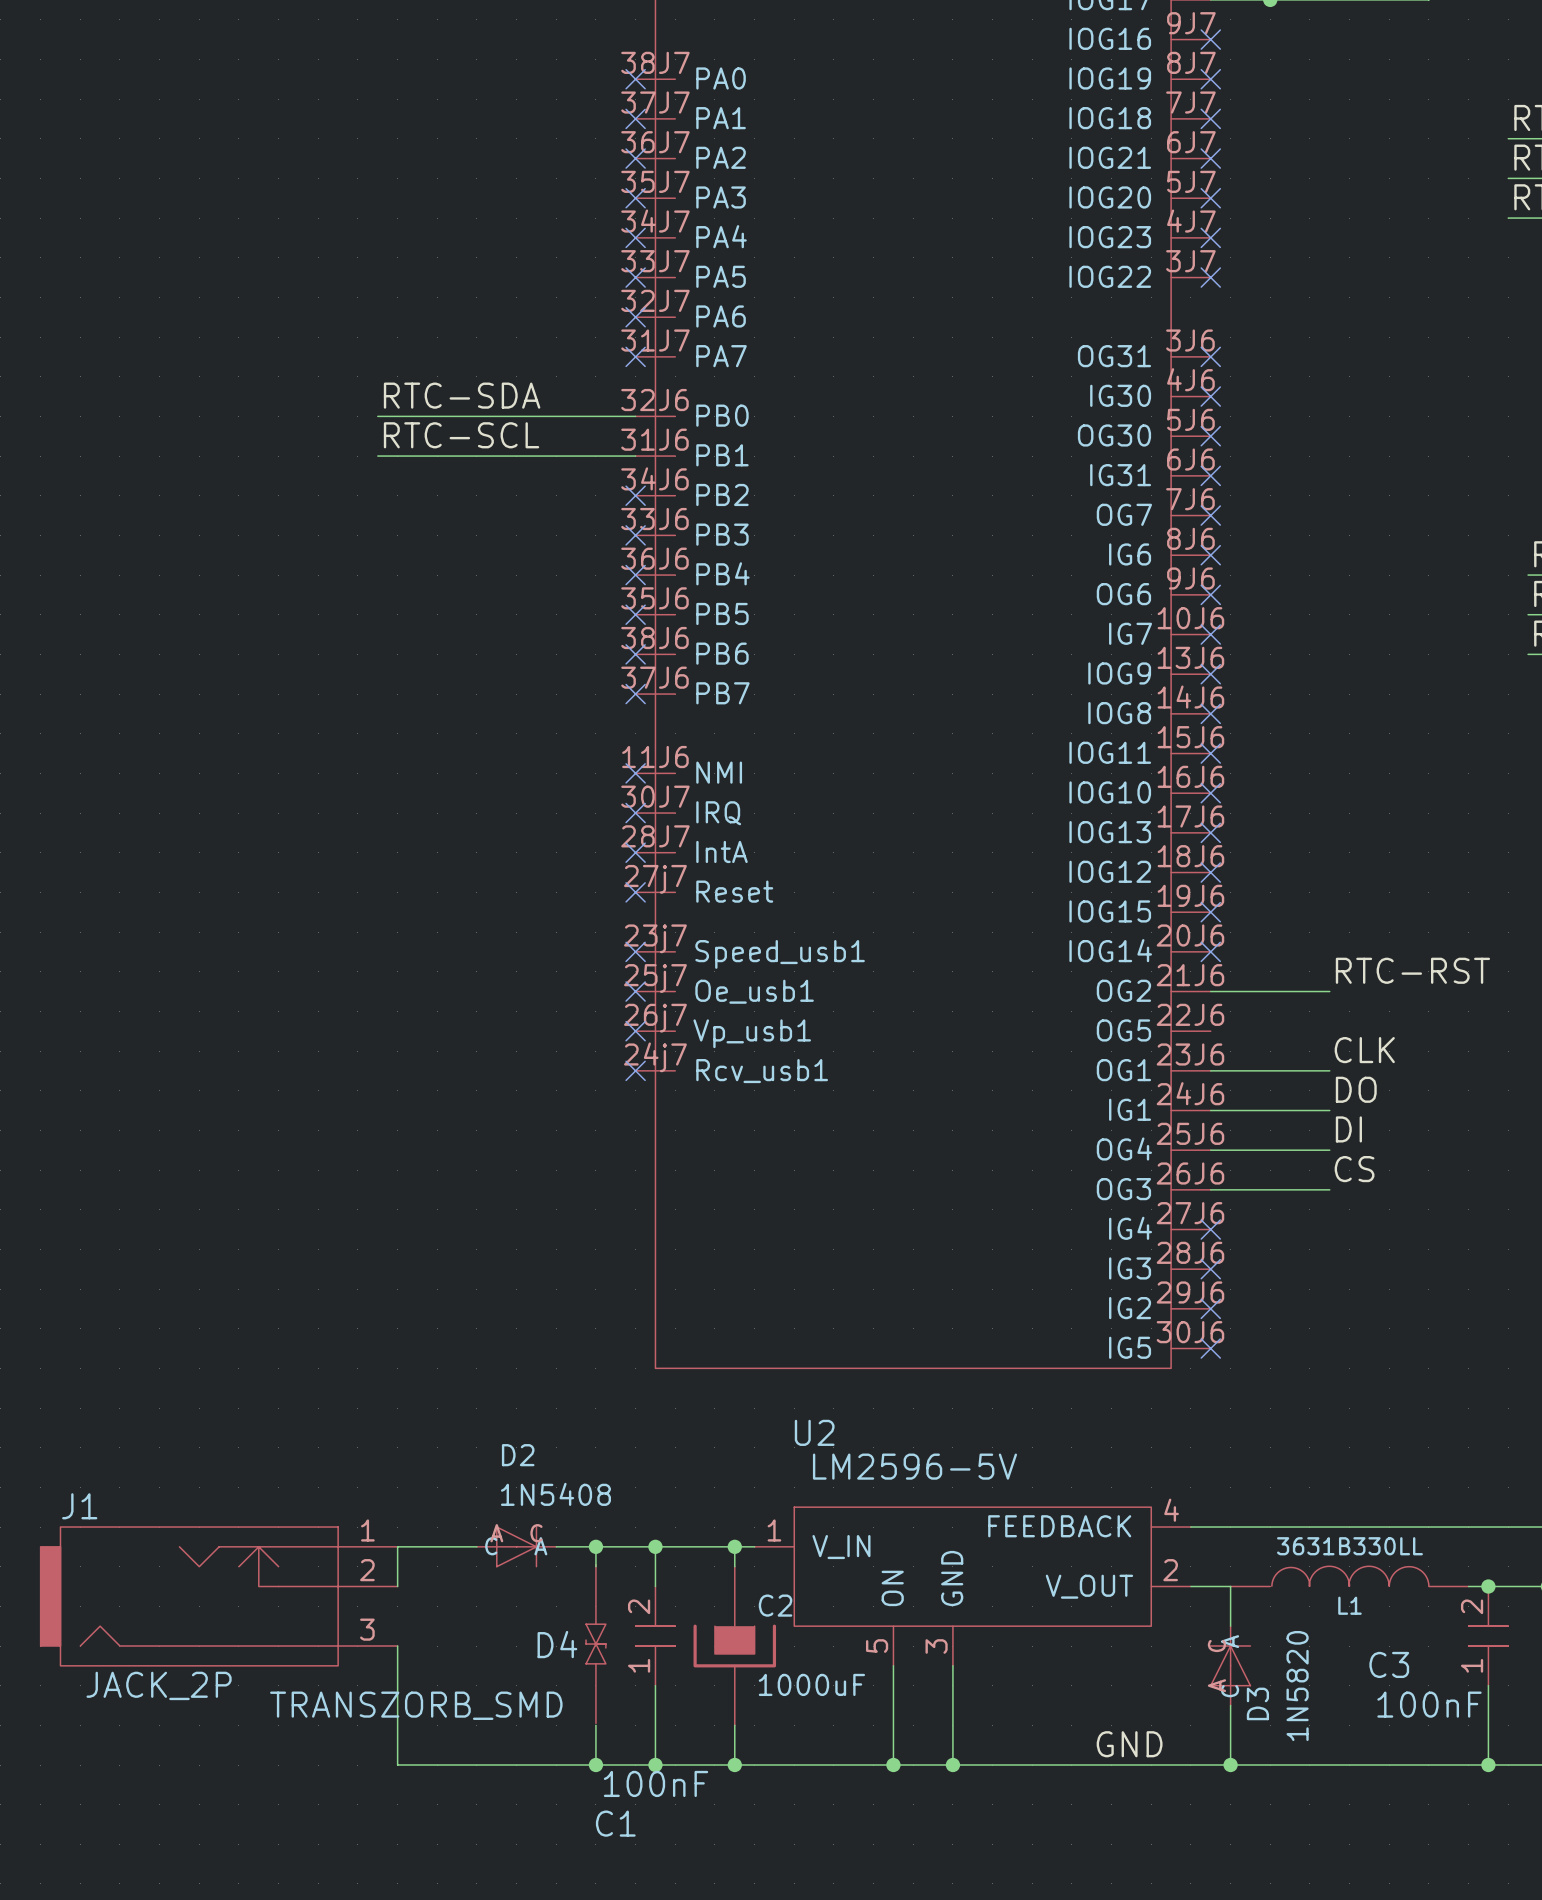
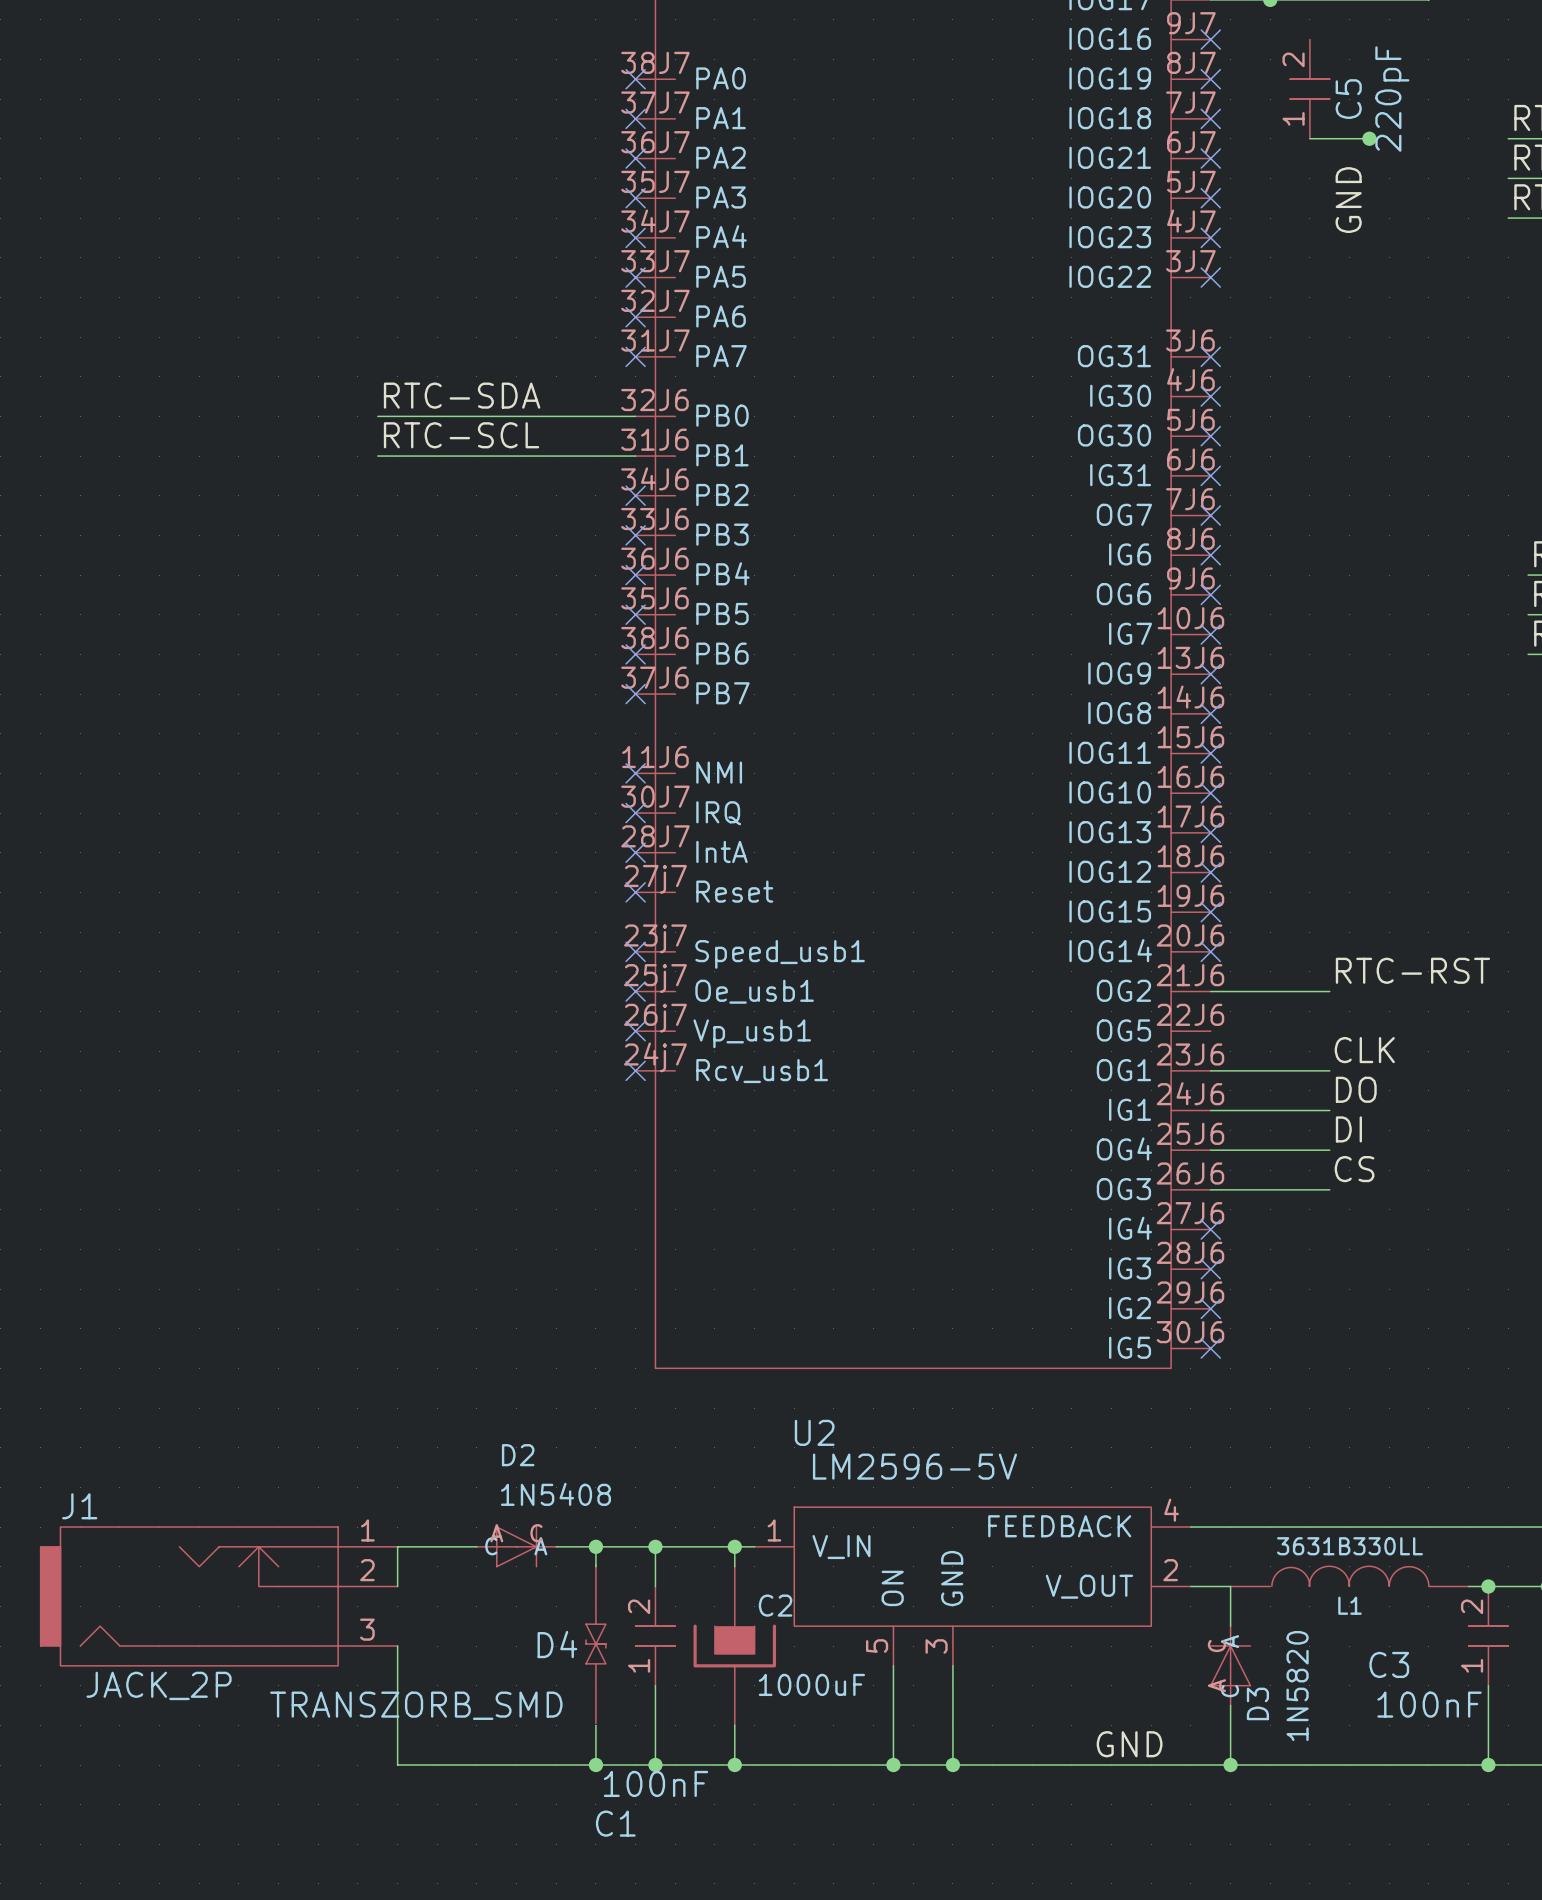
C5: none -> 220pF (1309, 89)
wire: none -> (1309, 138) (1369, 138)
junction: none -> (1369, 138)
label: none -> GND (1348, 200)

